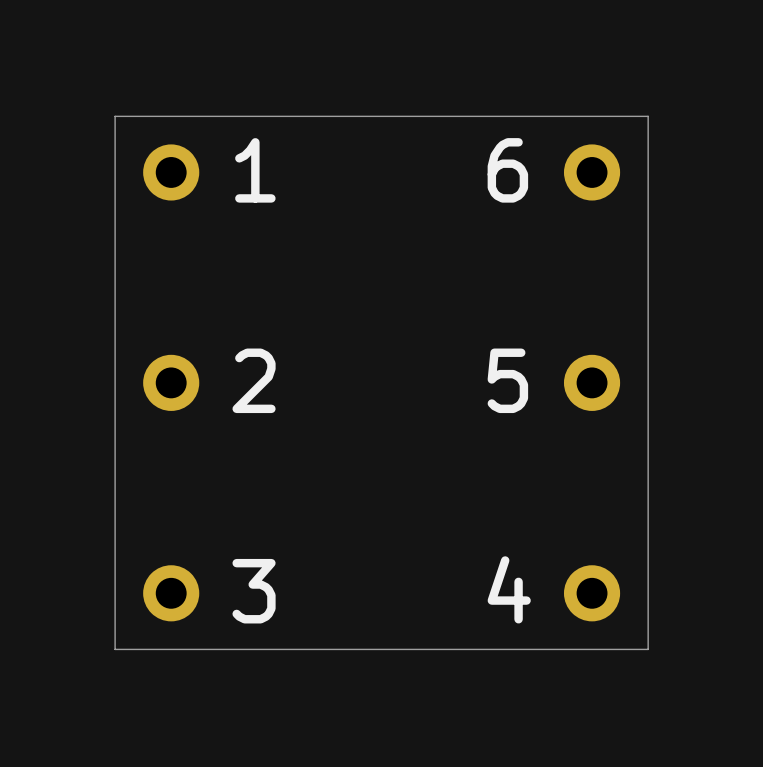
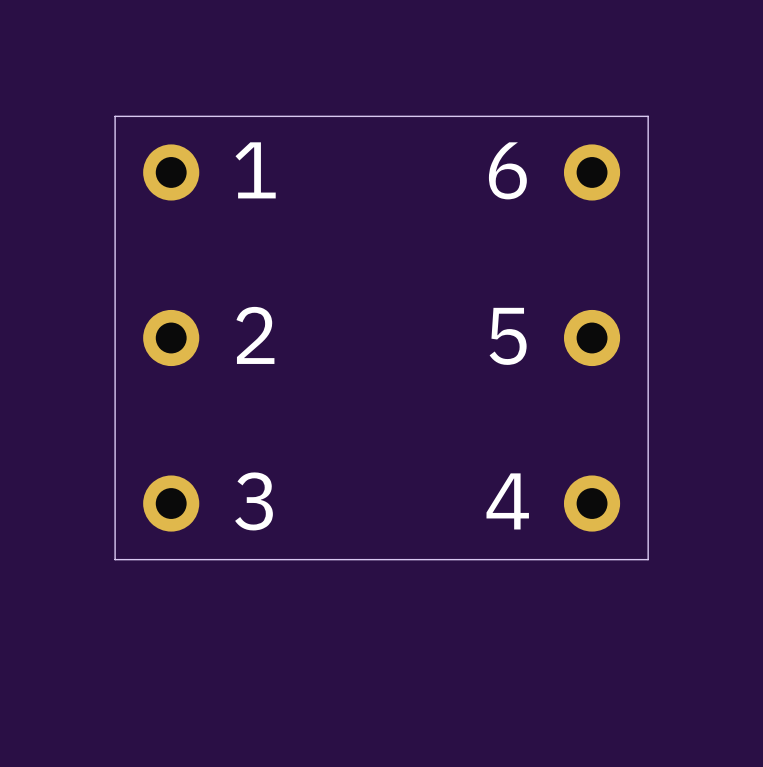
part position: (171, 382) -> (171, 338)
part position: (592, 382) -> (592, 338)
board edge: (115, 559) (115, 649) (648, 649) (648, 559) -> (115, 559) (648, 559)
part position: (171, 593) -> (171, 503)
part position: (592, 593) -> (592, 503)

